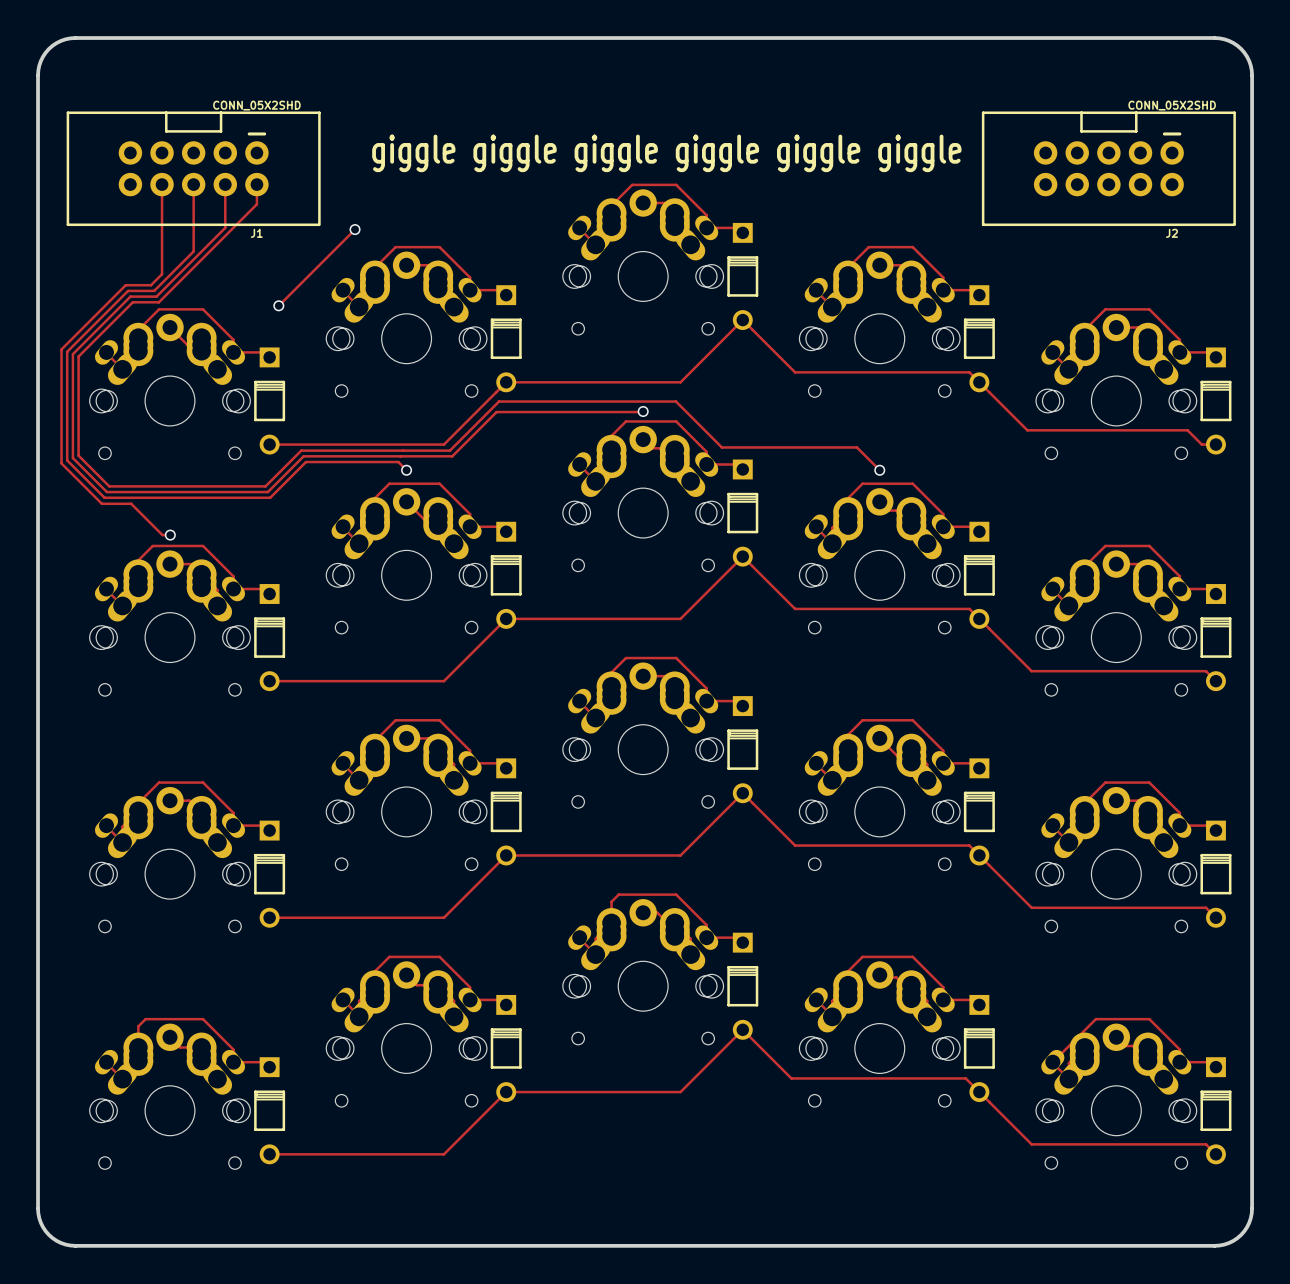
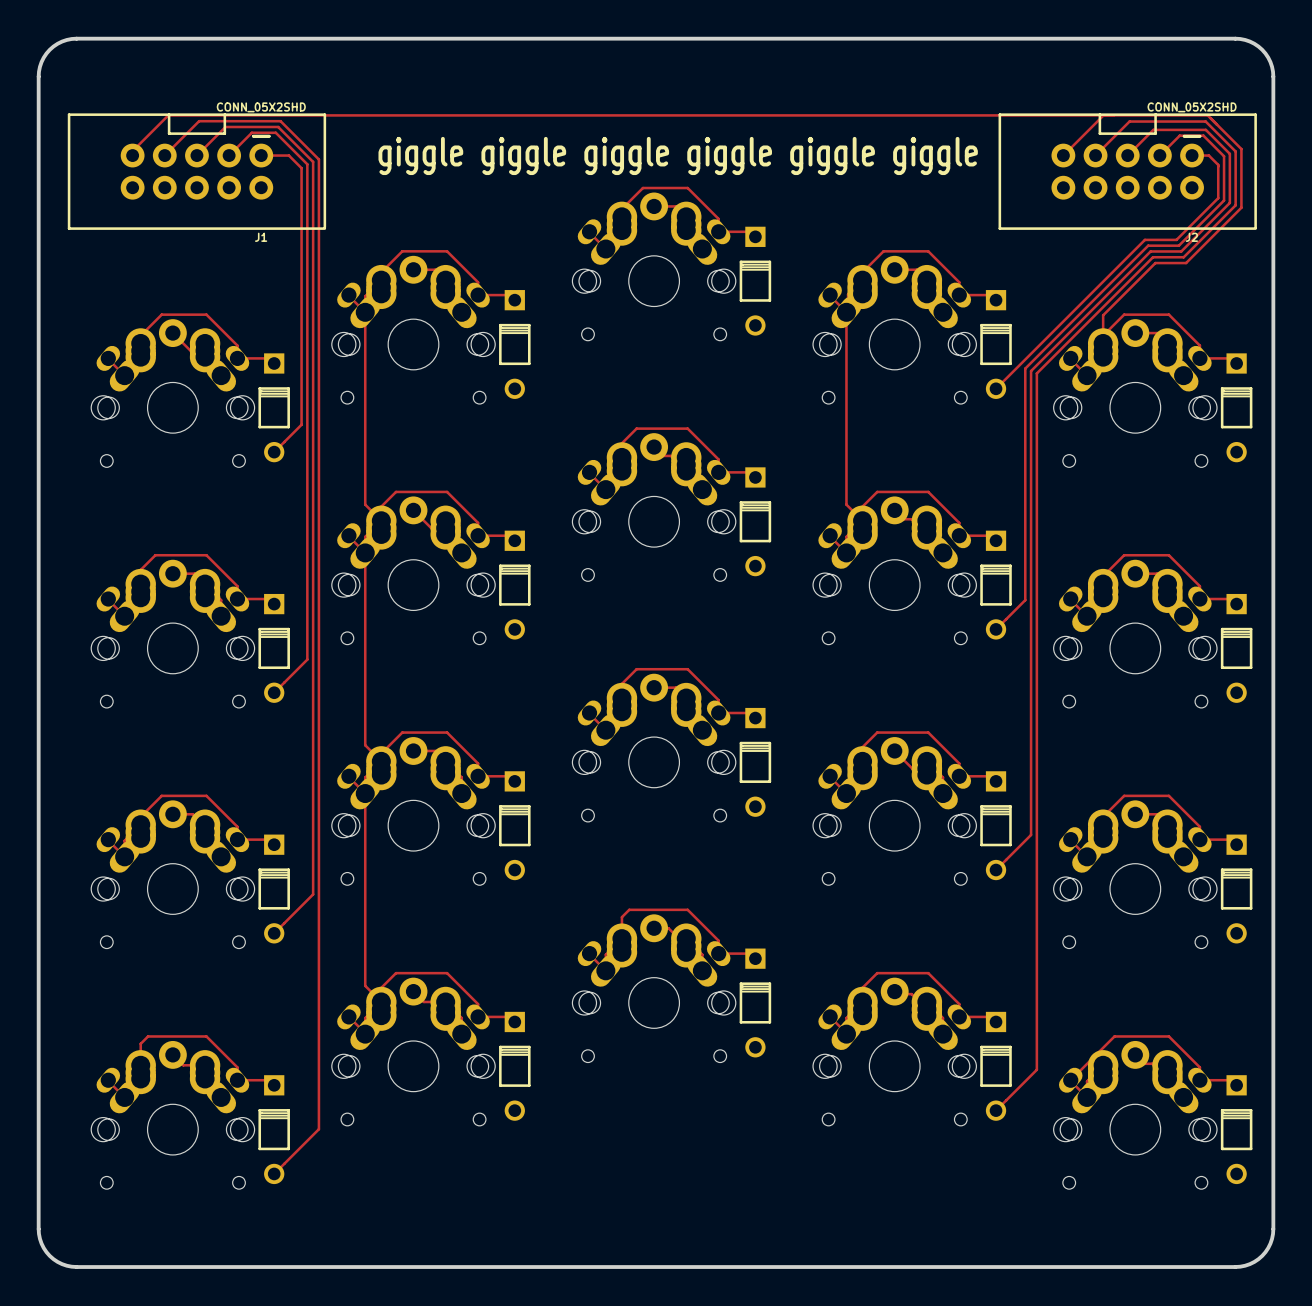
track: none -> (1103, 115) (1063, 155)
track: none -> (132, 151) (168, 115) (1207, 115) (1241, 149) (1241, 207) (1186, 263) (1155, 263) (1103, 315) (1103, 335)
track: none -> (1095, 155) (1129, 121) (1205, 121) (1235, 151) (1235, 205) (1183, 257) (1153, 257) (1036, 373) (1036, 1069) (996, 1110)
track: none -> (1127, 155) (1153, 129) (1205, 129) (1229, 153) (1229, 202) (1181, 251) (1150, 251) (1031, 371) (1031, 834) (996, 870)
track: none -> (1159, 155) (1179, 135) (1203, 135) (1224, 156) (1224, 200) (1178, 245) (1148, 245) (1025, 368) (1025, 600) (996, 629)
track: none -> (1192, 155) (1208, 155) (1218, 164) (1218, 198) (1176, 239) (1144, 239) (996, 388)
track: (162, 184) (162, 274) (151, 285) (125, 285) (61, 349) (61, 463) (101, 503) (131, 503) (162, 535) (170, 535) -> none
track: (193, 184) (193, 251) (154, 290) (128, 290) (67, 351) (67, 460) (104, 497) (270, 497) (305, 462) (398, 462) (406, 470) -> none
track: (225, 184) (225, 227) (156, 296) (130, 296) (72, 354) (72, 458) (106, 492) (267, 492) (303, 456) (400, 456) -> none
track: (256, 184) (256, 204) (158, 302) (132, 302) (78, 356) (78, 455) (109, 486) (265, 486) (301, 450) (449, 450) (499, 401) (675, 401) (721, 447) (856, 447) (879, 470) -> none
track: (355, 229) (278, 305) -> none
via: (355, 229) -> none
track: none -> (381, 280) (365, 296) (365, 504) (381, 520) (365, 536) (365, 745) (381, 761) (365, 777) (365, 985) (381, 1001)
track: none -> (862, 280) (848, 294) (846, 312) (846, 504) (862, 520)
via: (278, 305) -> none
track: (643, 411) (496, 412) (452, 456) (400, 456) -> none
via: (643, 411) -> none
track: (269, 444) (443, 444) (506, 382) (680, 382) (742, 320) (795, 372) (969, 372) (1027, 430) (1187, 430) (1201, 444) (1215, 444) -> (274, 452) (301, 424) (301, 168) (288, 155) (261, 155)
via: (406, 470) -> none
via: (879, 470) -> none
via: (170, 535) -> none
track: (269, 681) (443, 681) (506, 618) (680, 618) (742, 556) (795, 608) (969, 608) (1031, 671) (1206, 671) (1215, 681) -> (274, 692) (307, 659) (307, 164) (275, 132) (251, 132) (229, 155)
track: (269, 917) (443, 917) (506, 855) (680, 855) (742, 793) (795, 845) (969, 845) (1031, 907) (1206, 907) (1215, 917) -> (274, 933) (313, 894) (313, 161) (278, 127) (225, 127) (196, 155)
track: (269, 1154) (443, 1154) (506, 1092) (680, 1092) (742, 1029) (791, 1078) (965, 1078) (1031, 1144) (1206, 1144) (1215, 1154) -> (274, 1173) (318, 1129) (318, 159) (280, 121) (199, 121) (164, 155)

